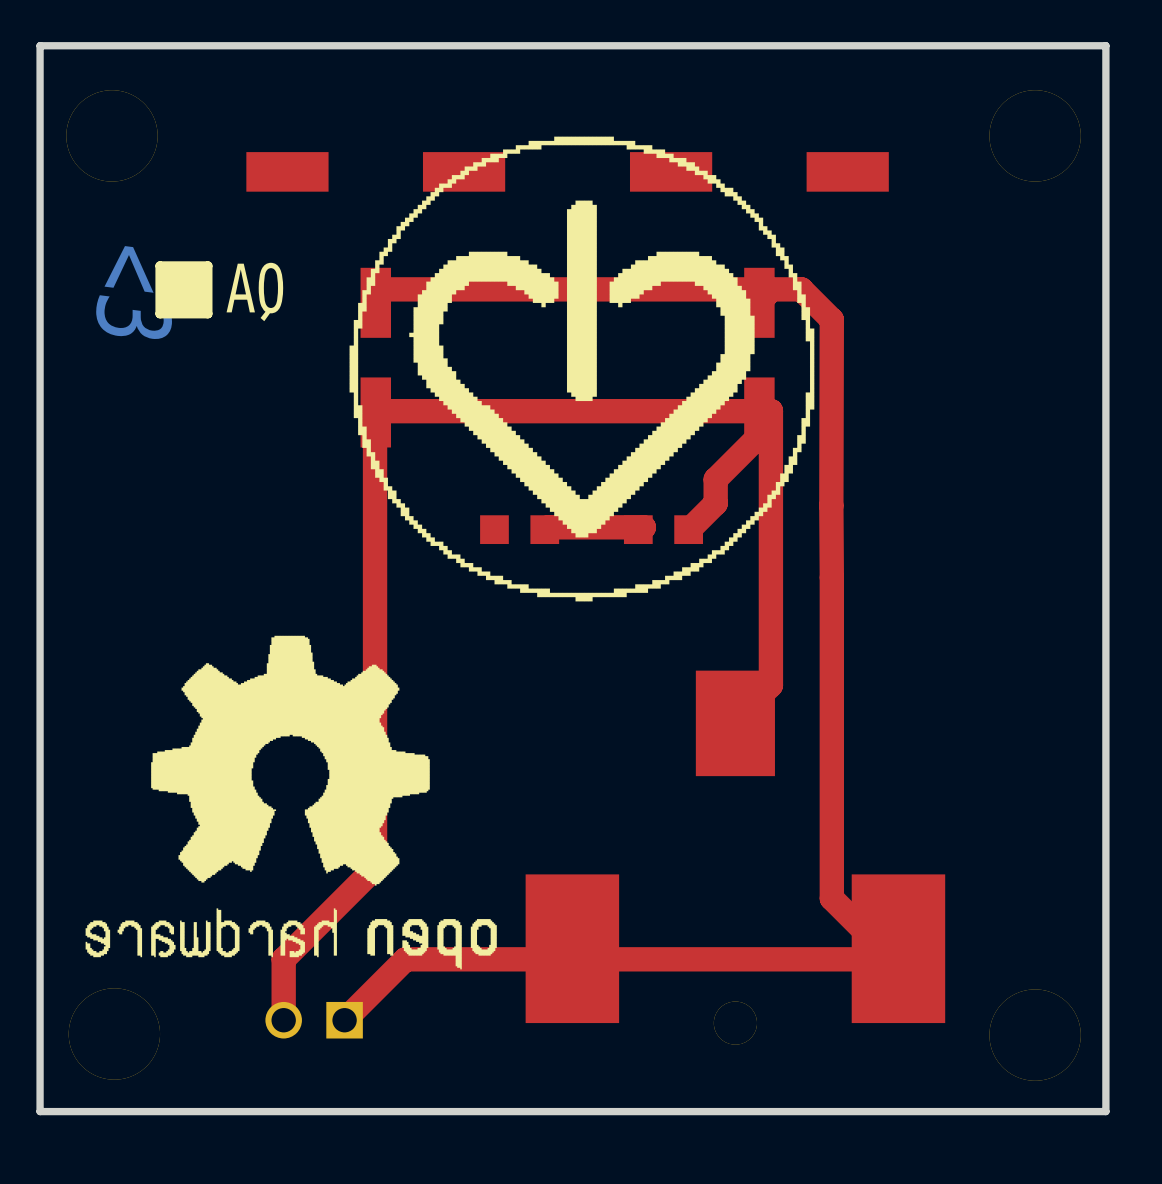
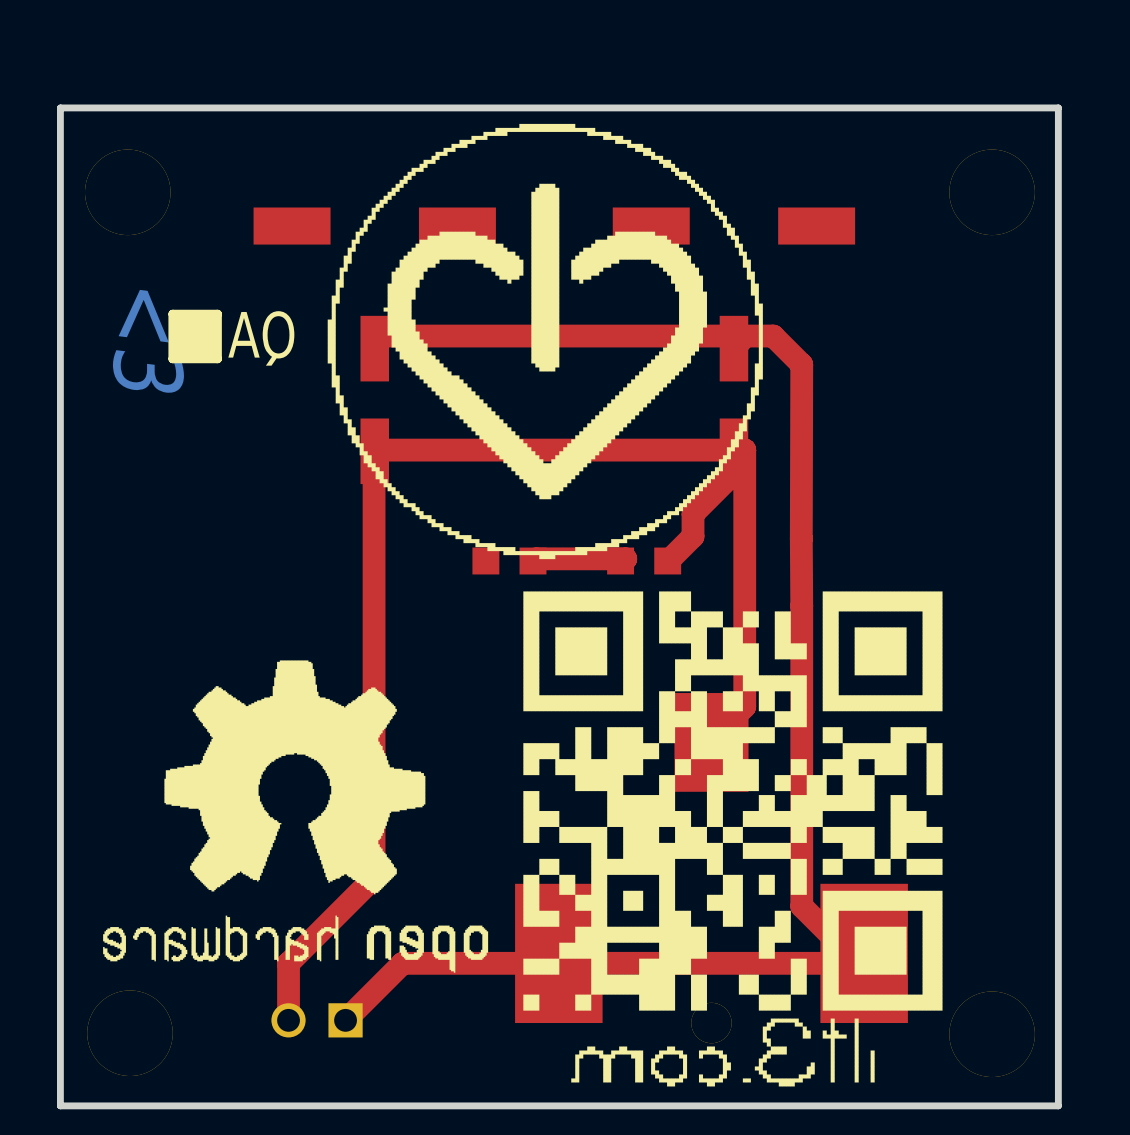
drawing position: (581, 369) -> (545, 341)
drawing: none -> [523, 591, 943, 1087]

